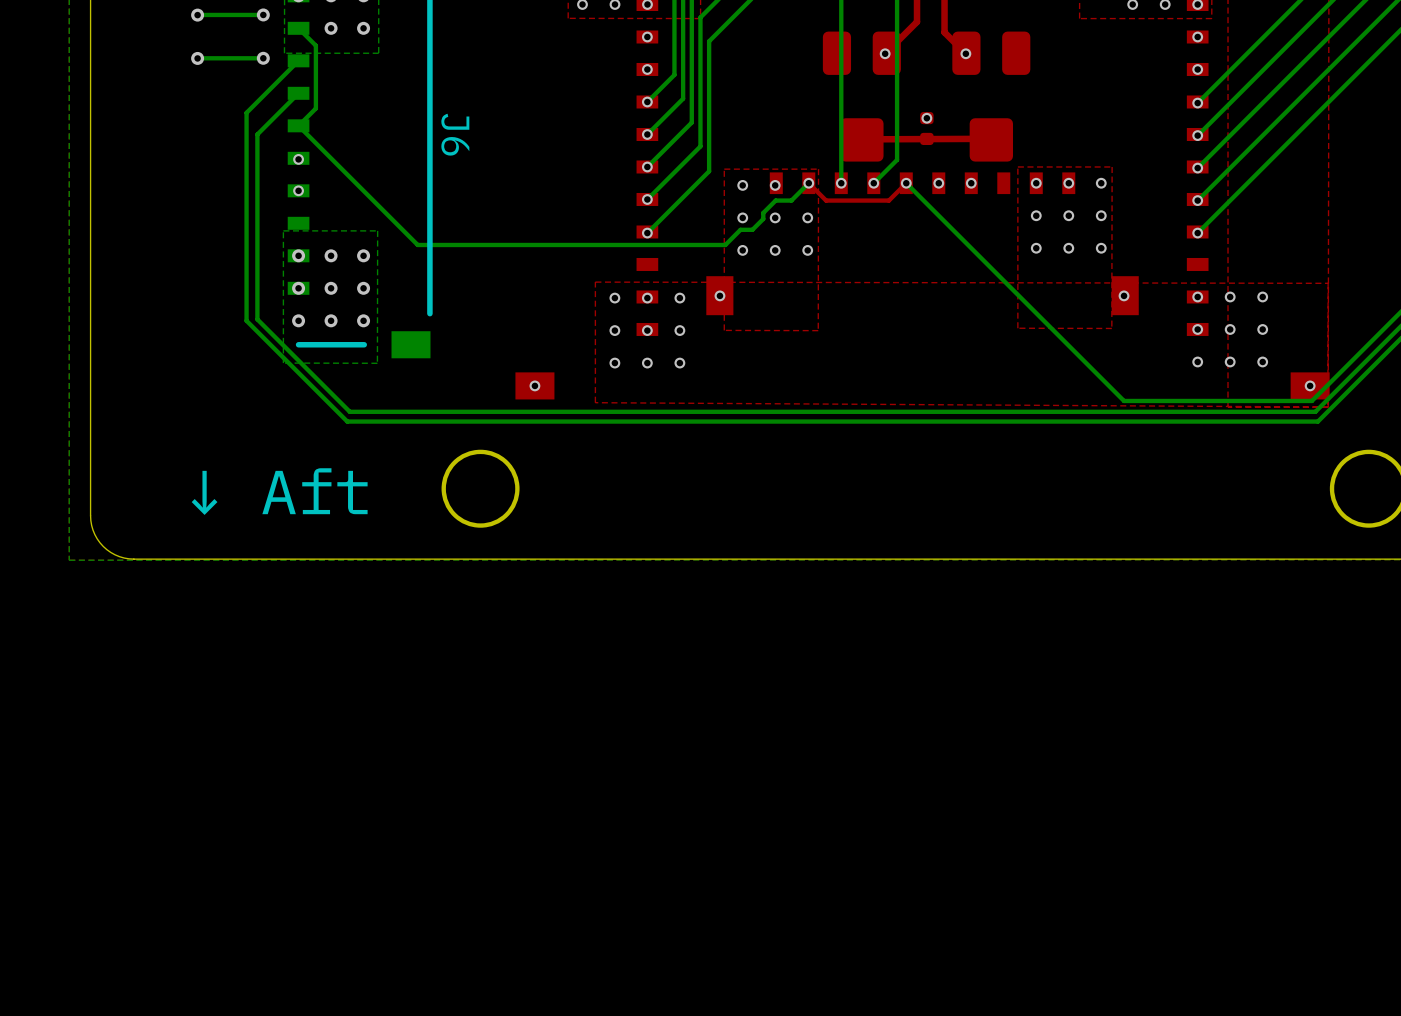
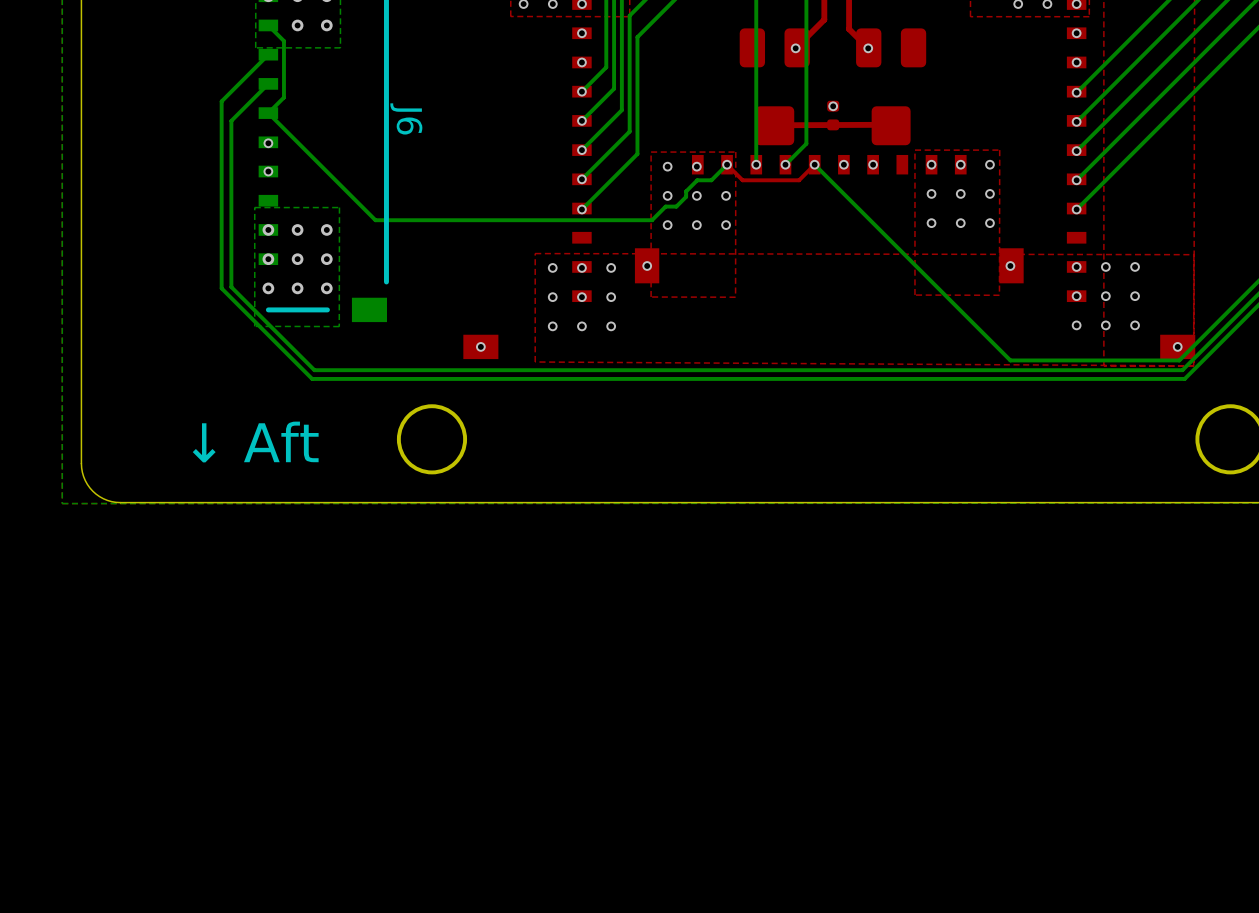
bottom track: (263, 14) (197, 14) -> none
via: (263, 14) -> none
via: (197, 15) -> none
via: (197, 58) -> none
bottom track: (263, 58) (197, 58) -> none
via: (263, 58) -> none

